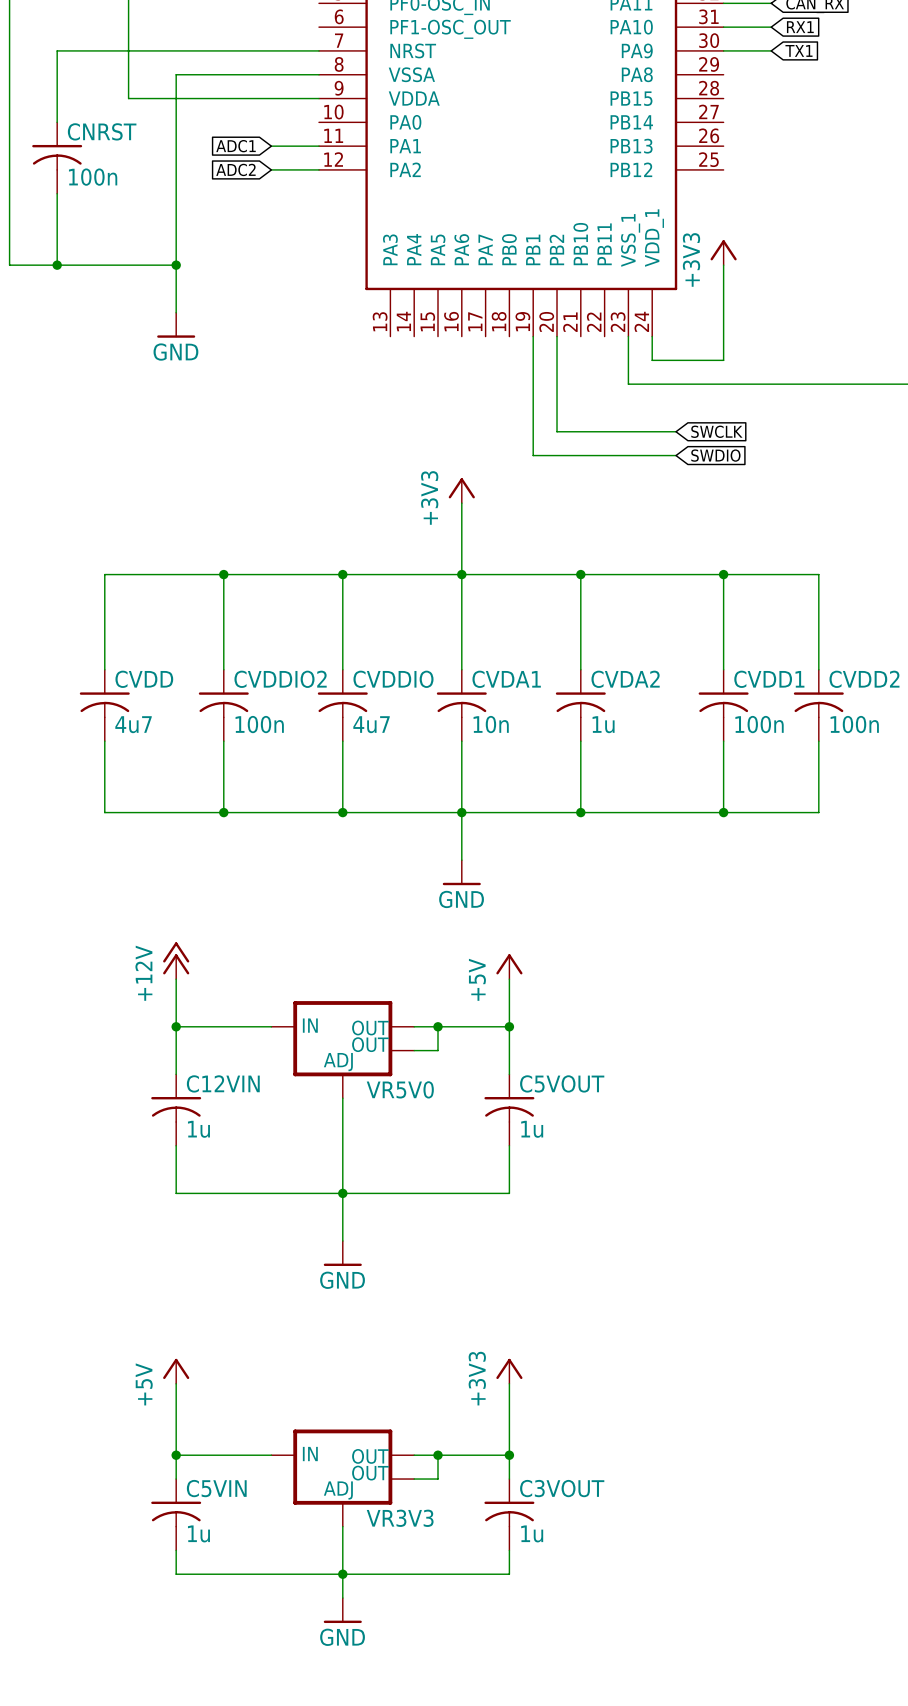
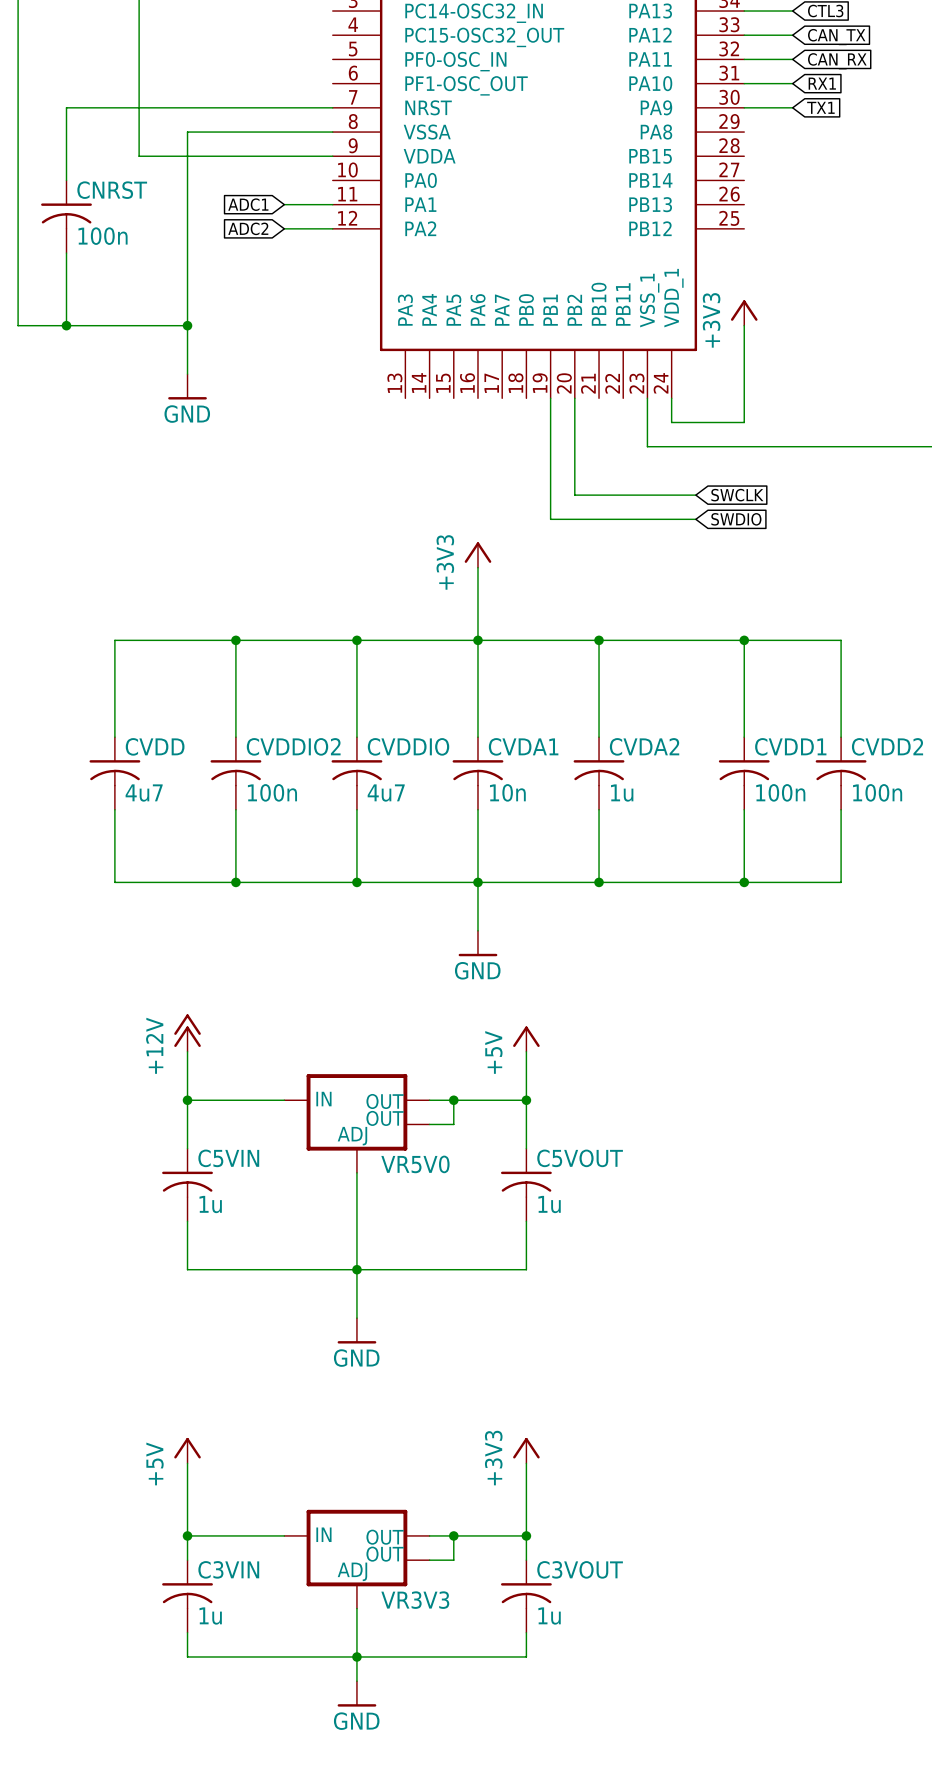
C12VIN name: C12VIN (223, 1083) -> C5VIN (228, 1158)
C5VIN name: C5VIN (216, 1488) -> C3VIN (228, 1569)

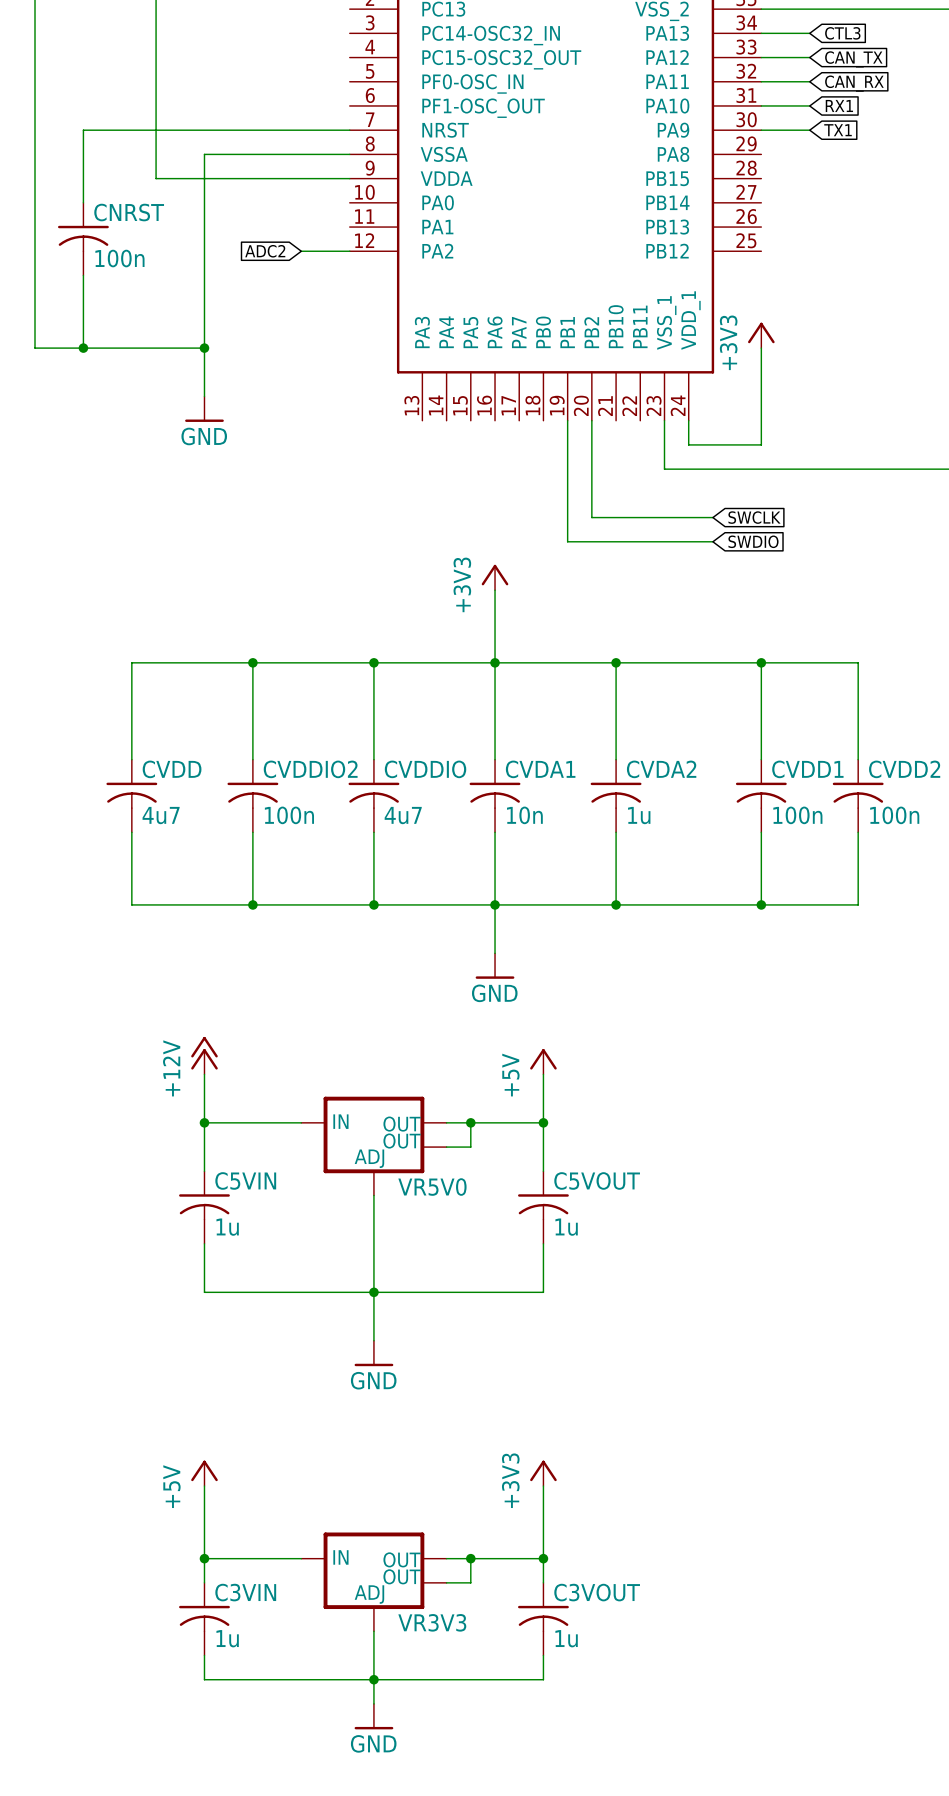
global label: ADC1 (248, 204) -> none
wire: (284, 204) (332, 204) -> none

